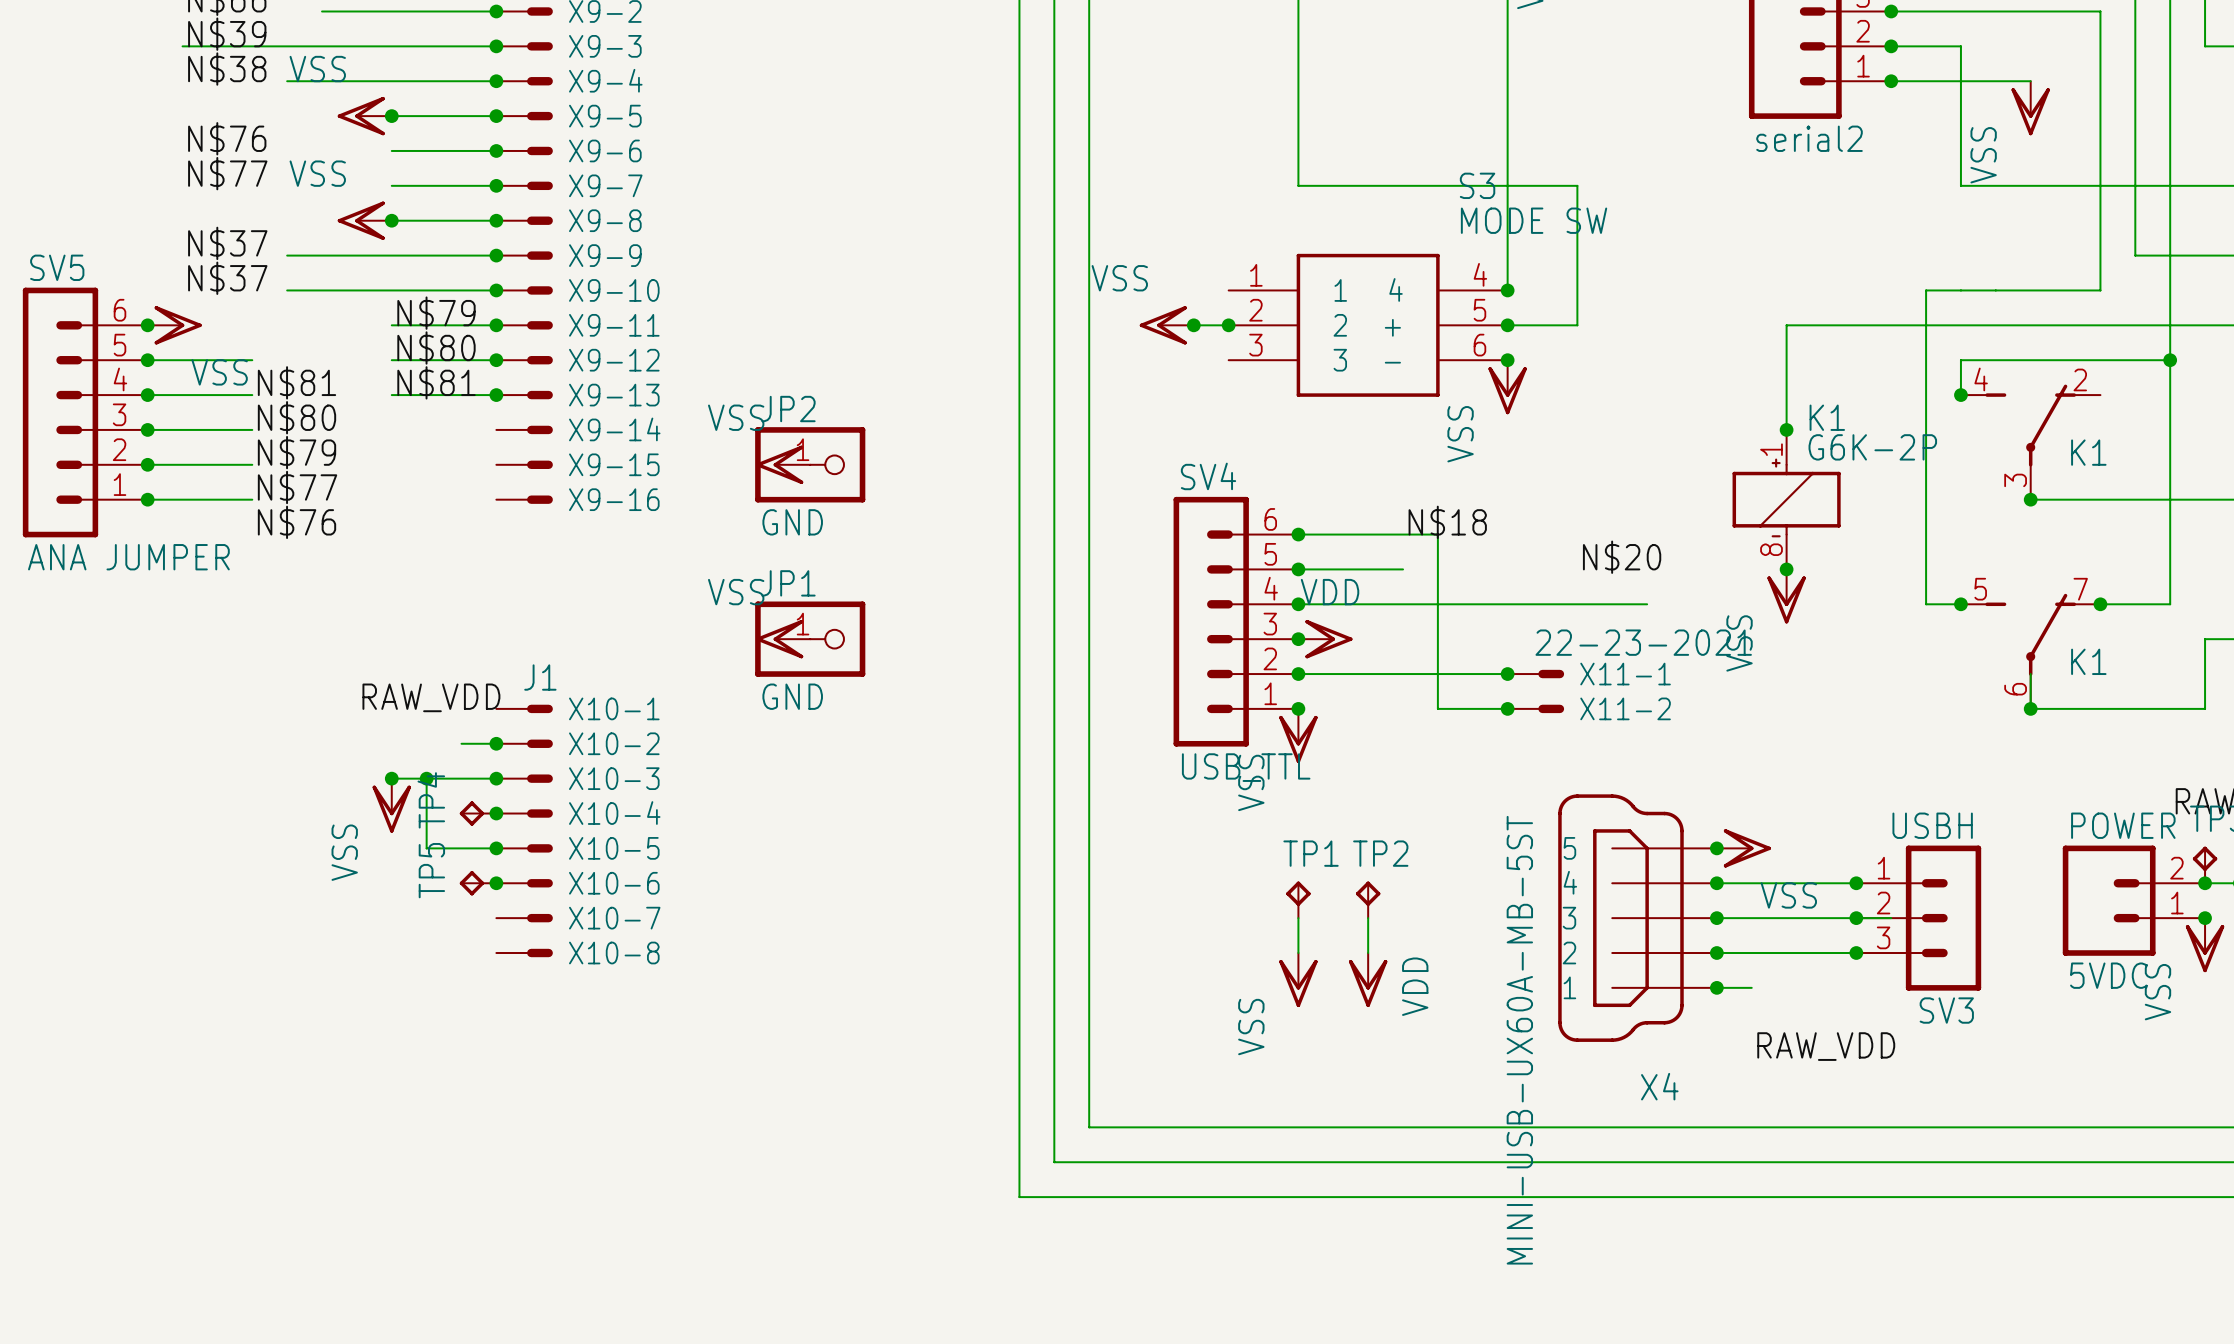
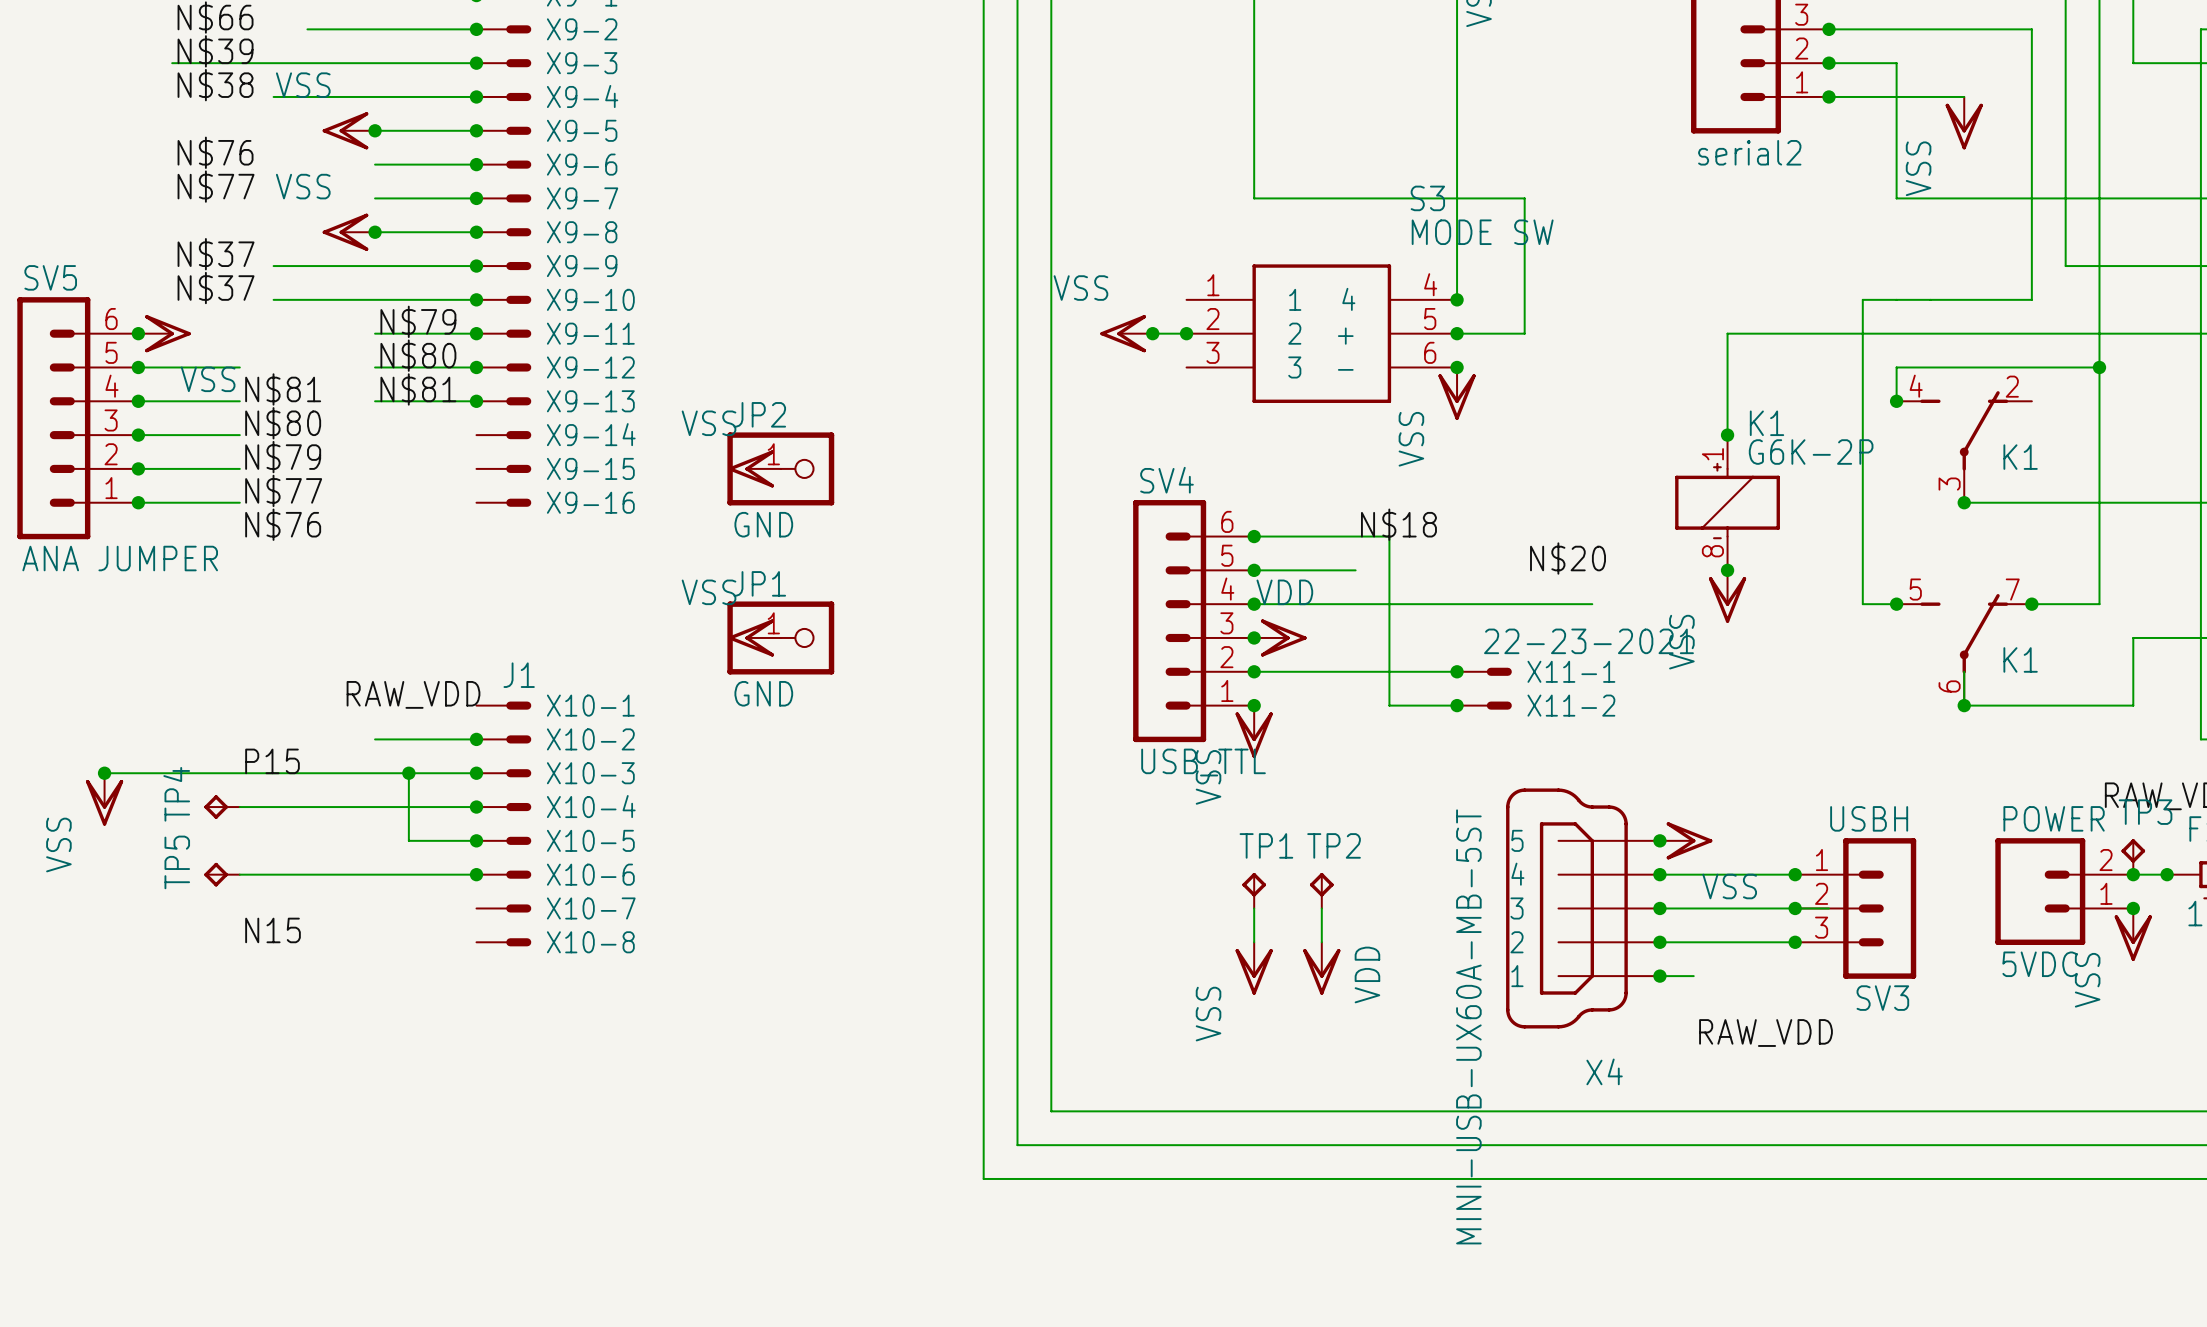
wire: none -> (375, 739) (442, 739)
label: none -> P15 (272, 761)
wire: none -> (104, 773) (375, 773)
junction: none -> (104, 773)
junction: (391, 778) -> none
power symbol position: VSS (391, 805) -> VSS (104, 799)
wire: none -> (239, 807) (476, 807)
TP4 position: (478, 813) -> (222, 807)
wire: none -> (239, 874) (476, 874)
TP5 position: (478, 883) -> (222, 874)
label: none -> N15 (273, 930)

